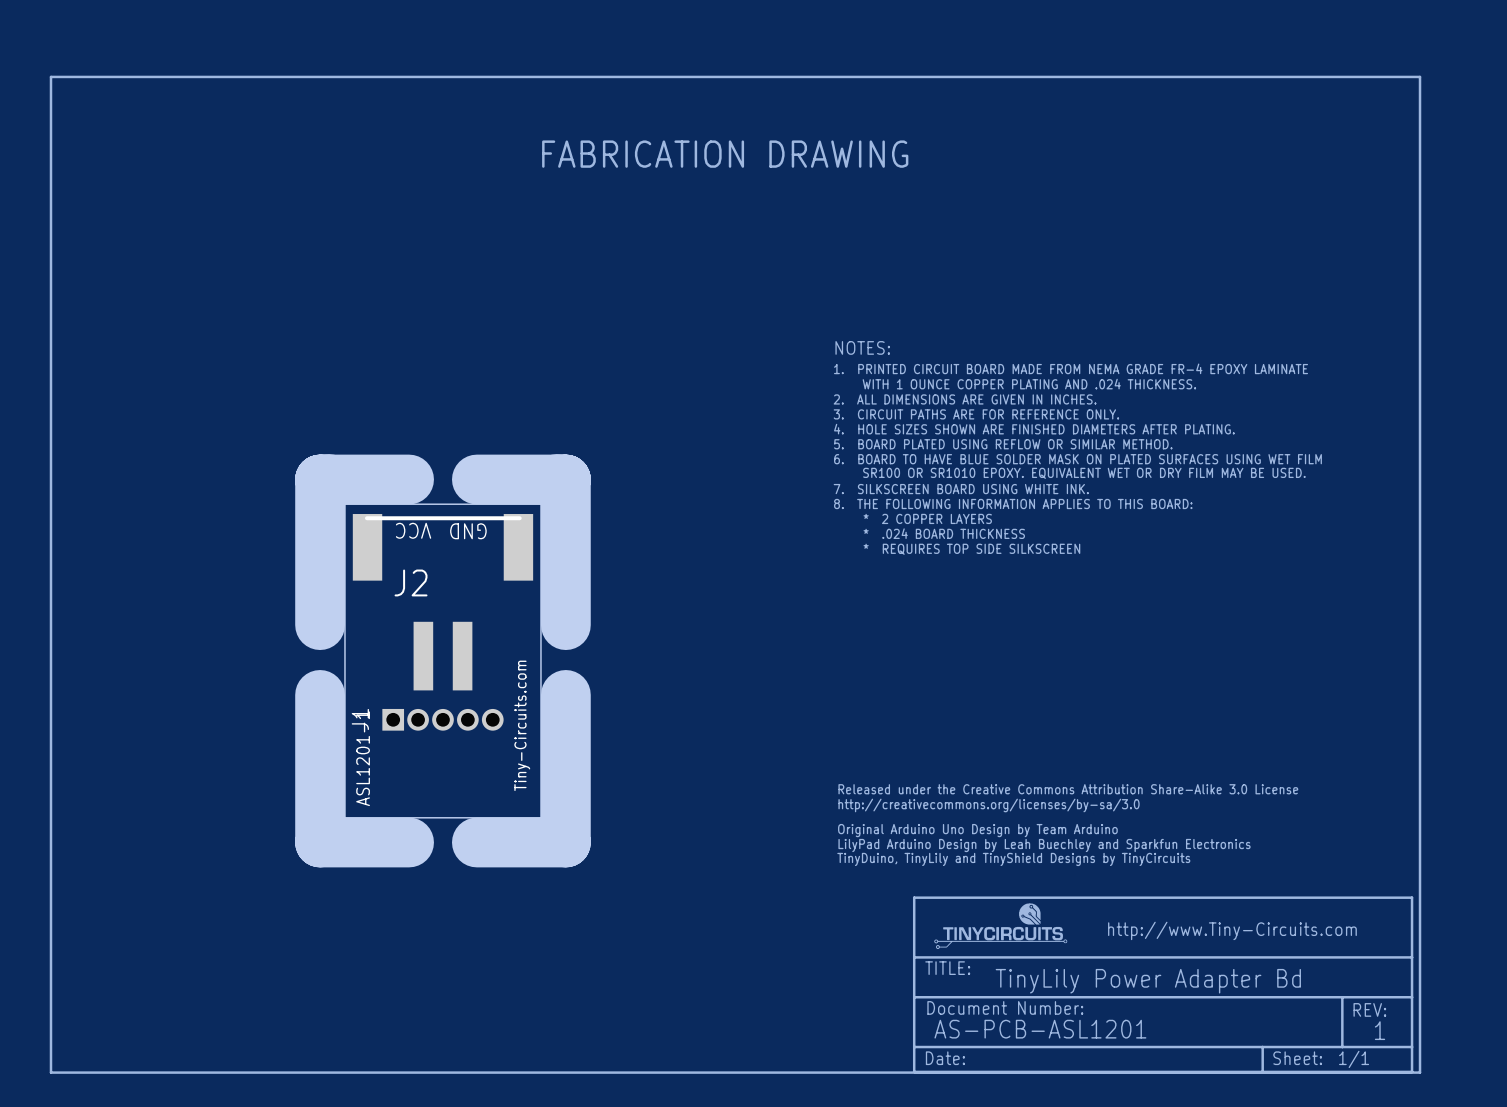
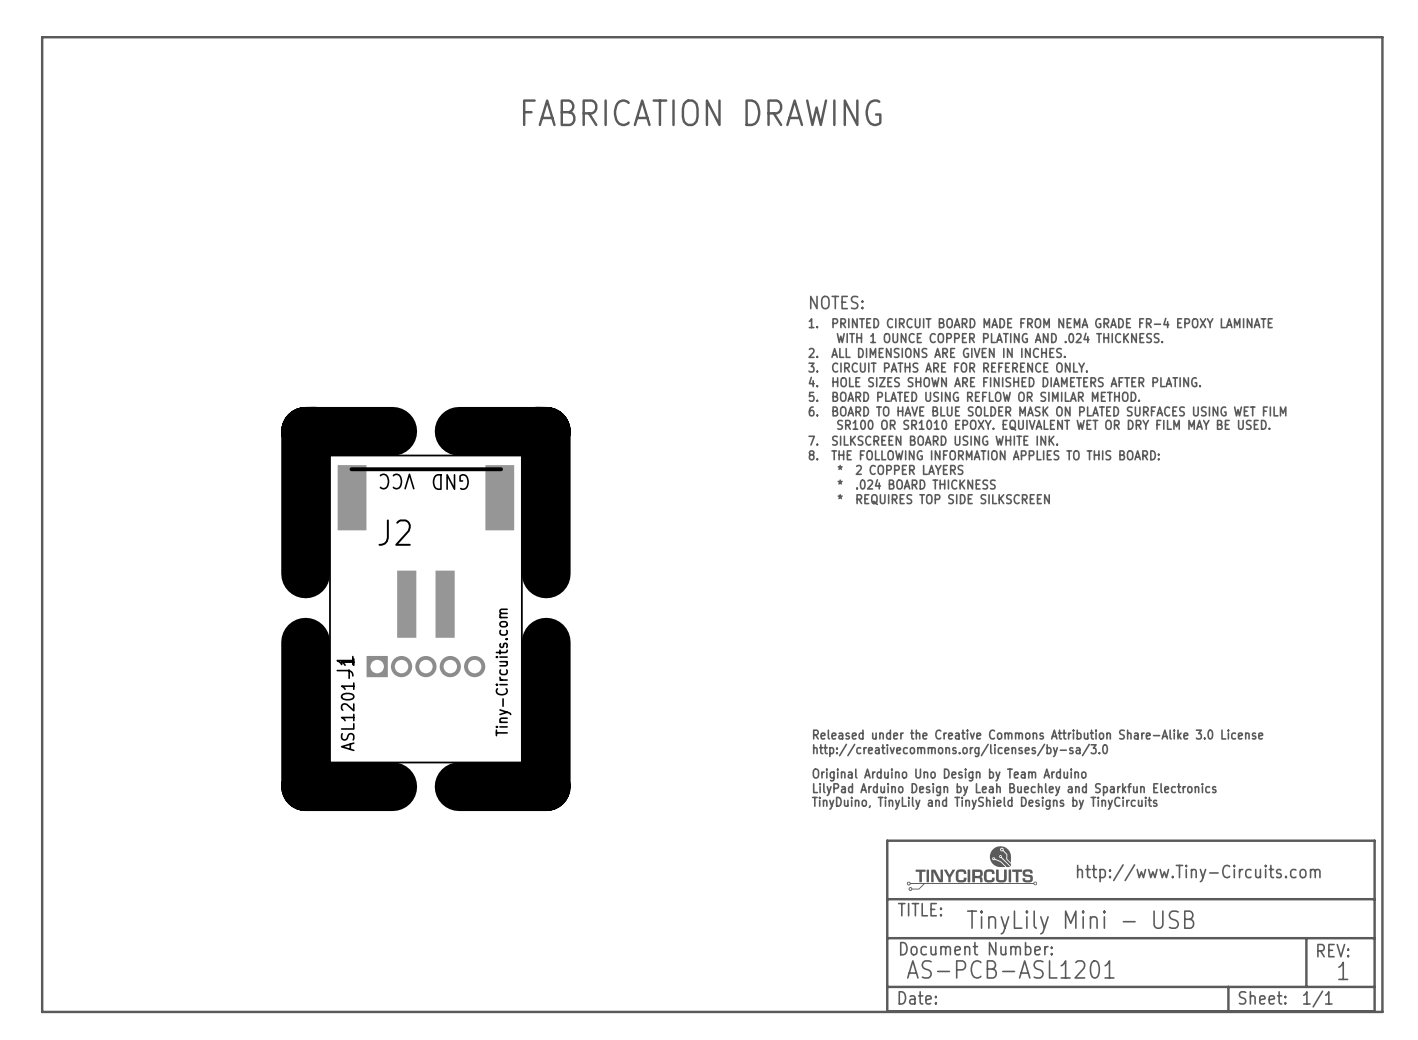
text: TinyLily Power Adapter Bd (1148, 981) -> TinyLily Mini - USB (1080, 922)

